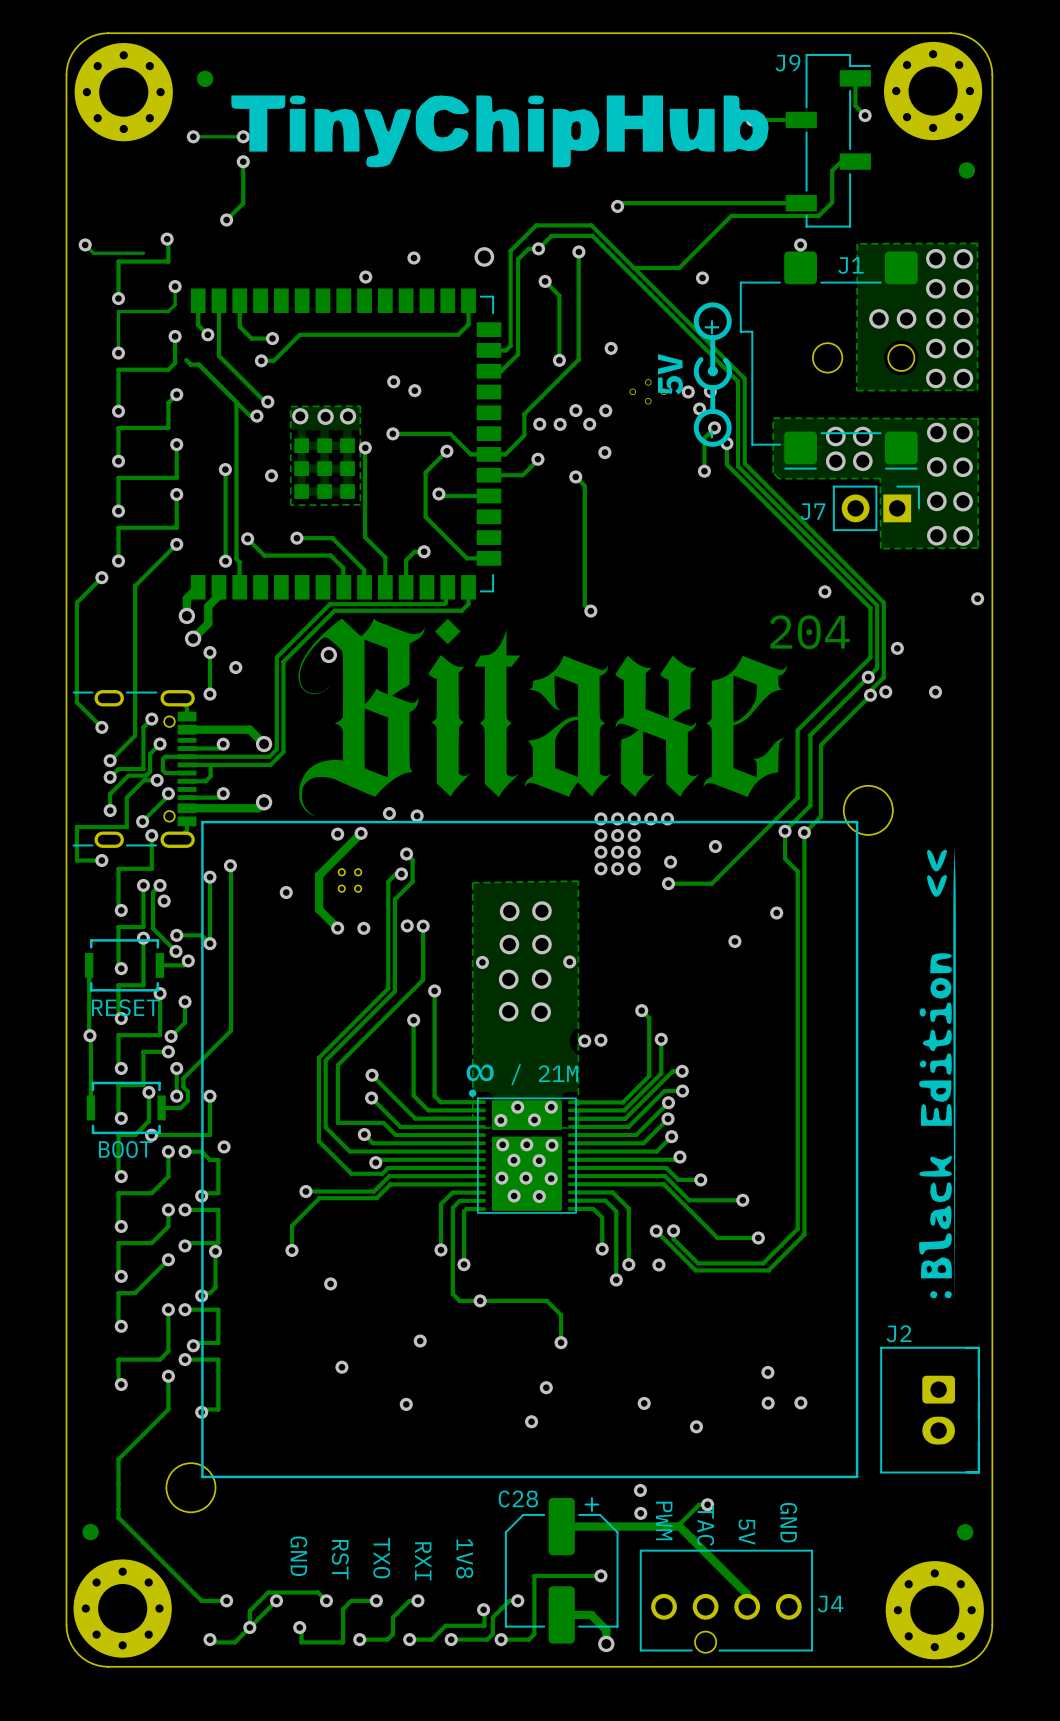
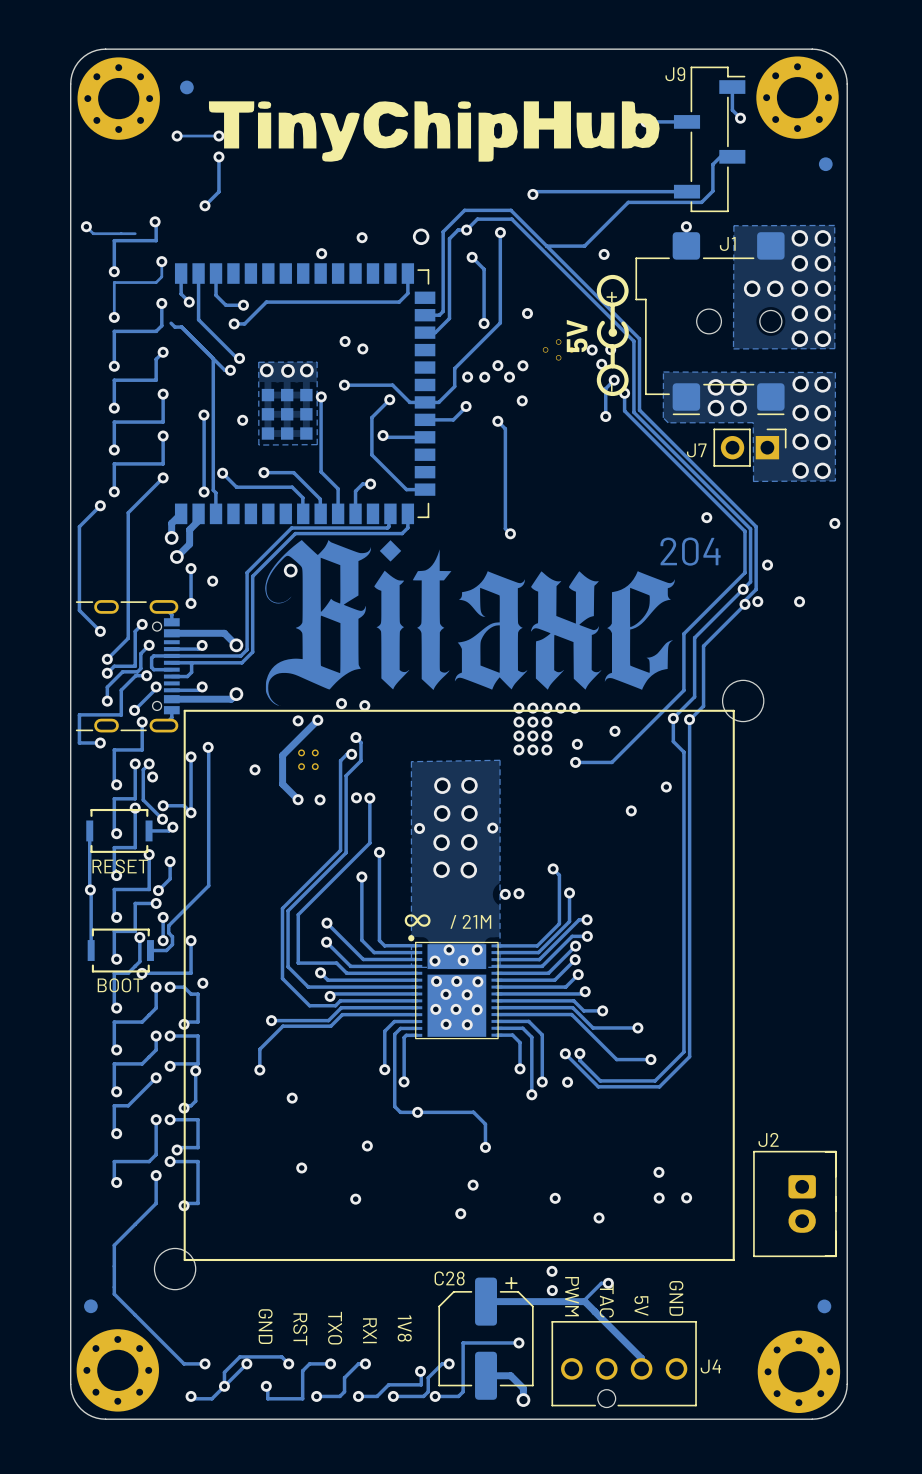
drawing: [919, 847, 956, 1309] -> none

